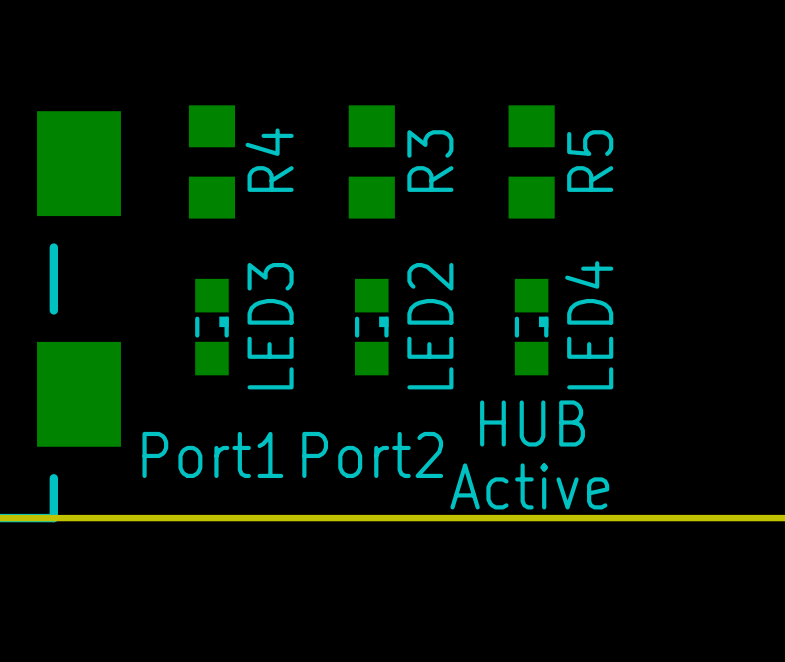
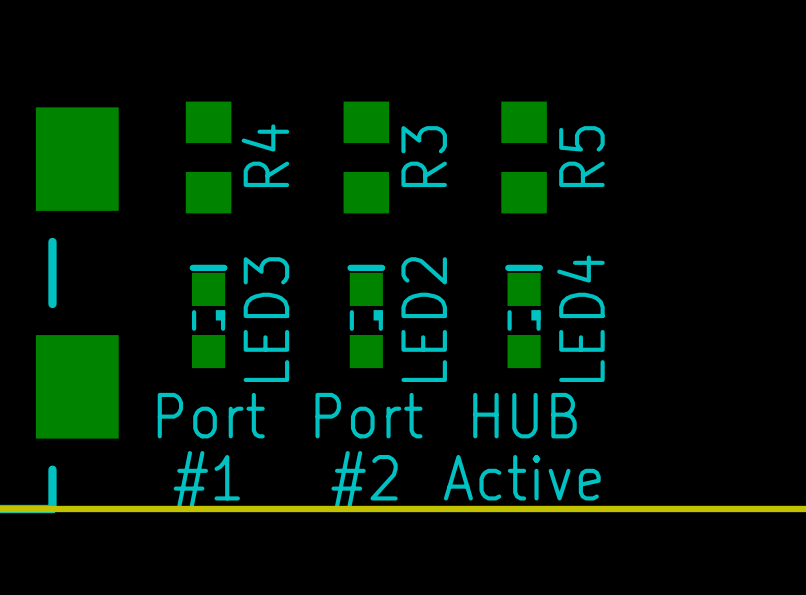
line: none -> (224, 267) (192, 267)
line: none -> (382, 267) (350, 267)
line: none -> (539, 267) (508, 267)
text: Port1 (212, 454) -> Port (211, 415)
text: Port2 (372, 454) -> Port (368, 415)
text: none -> #1 (206, 479)
text: none -> #2 (364, 479)

